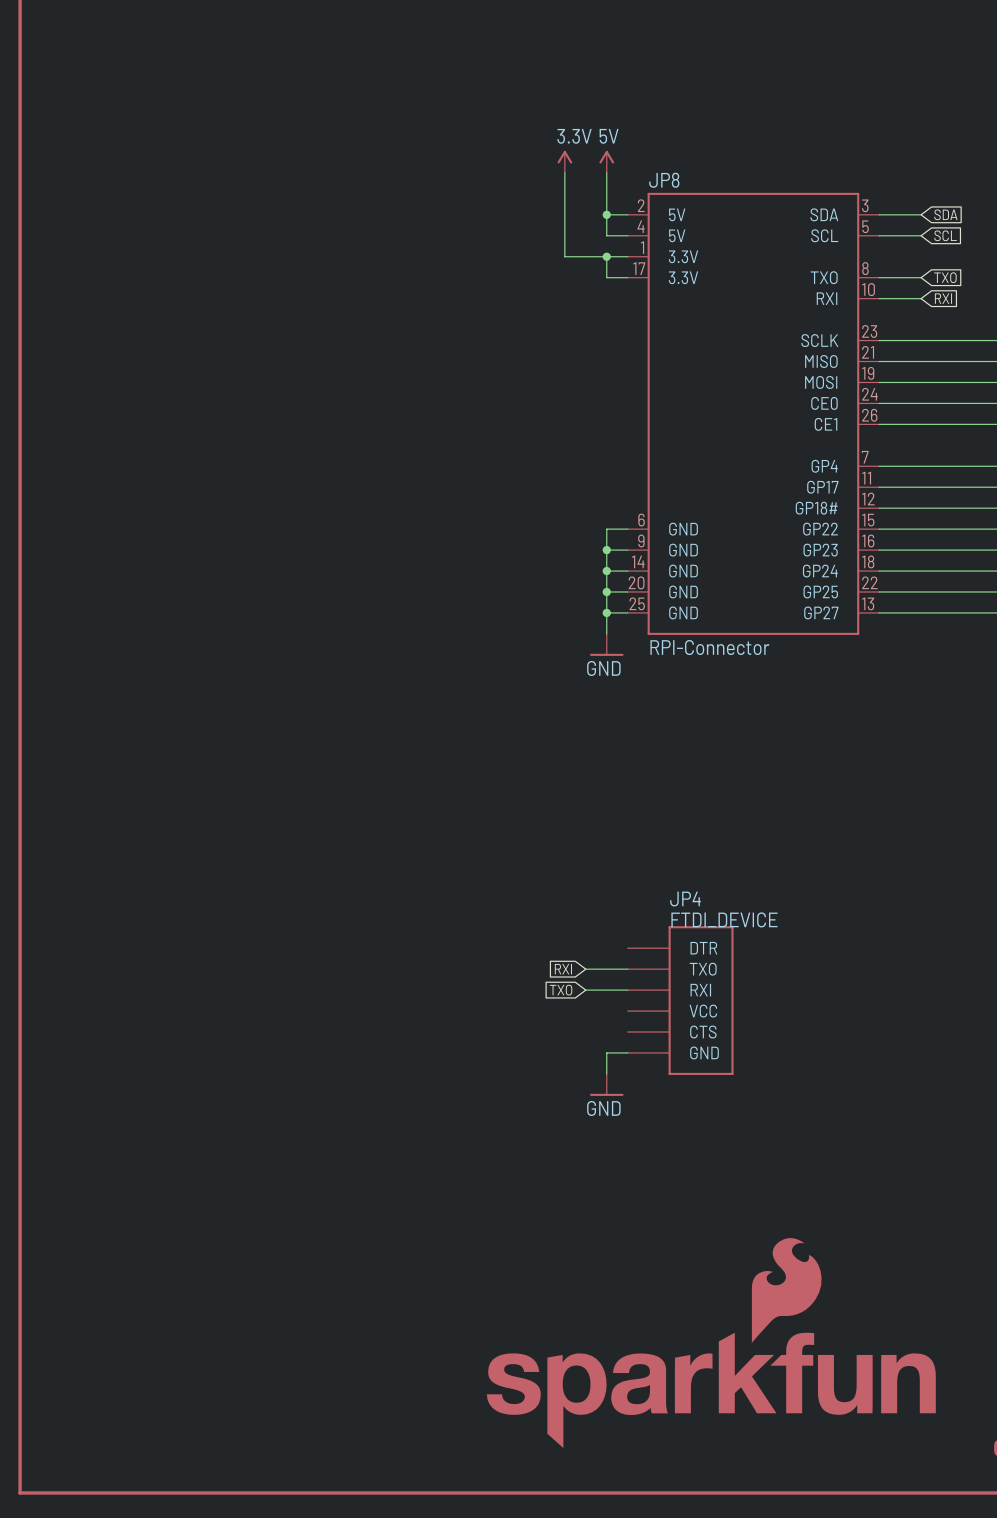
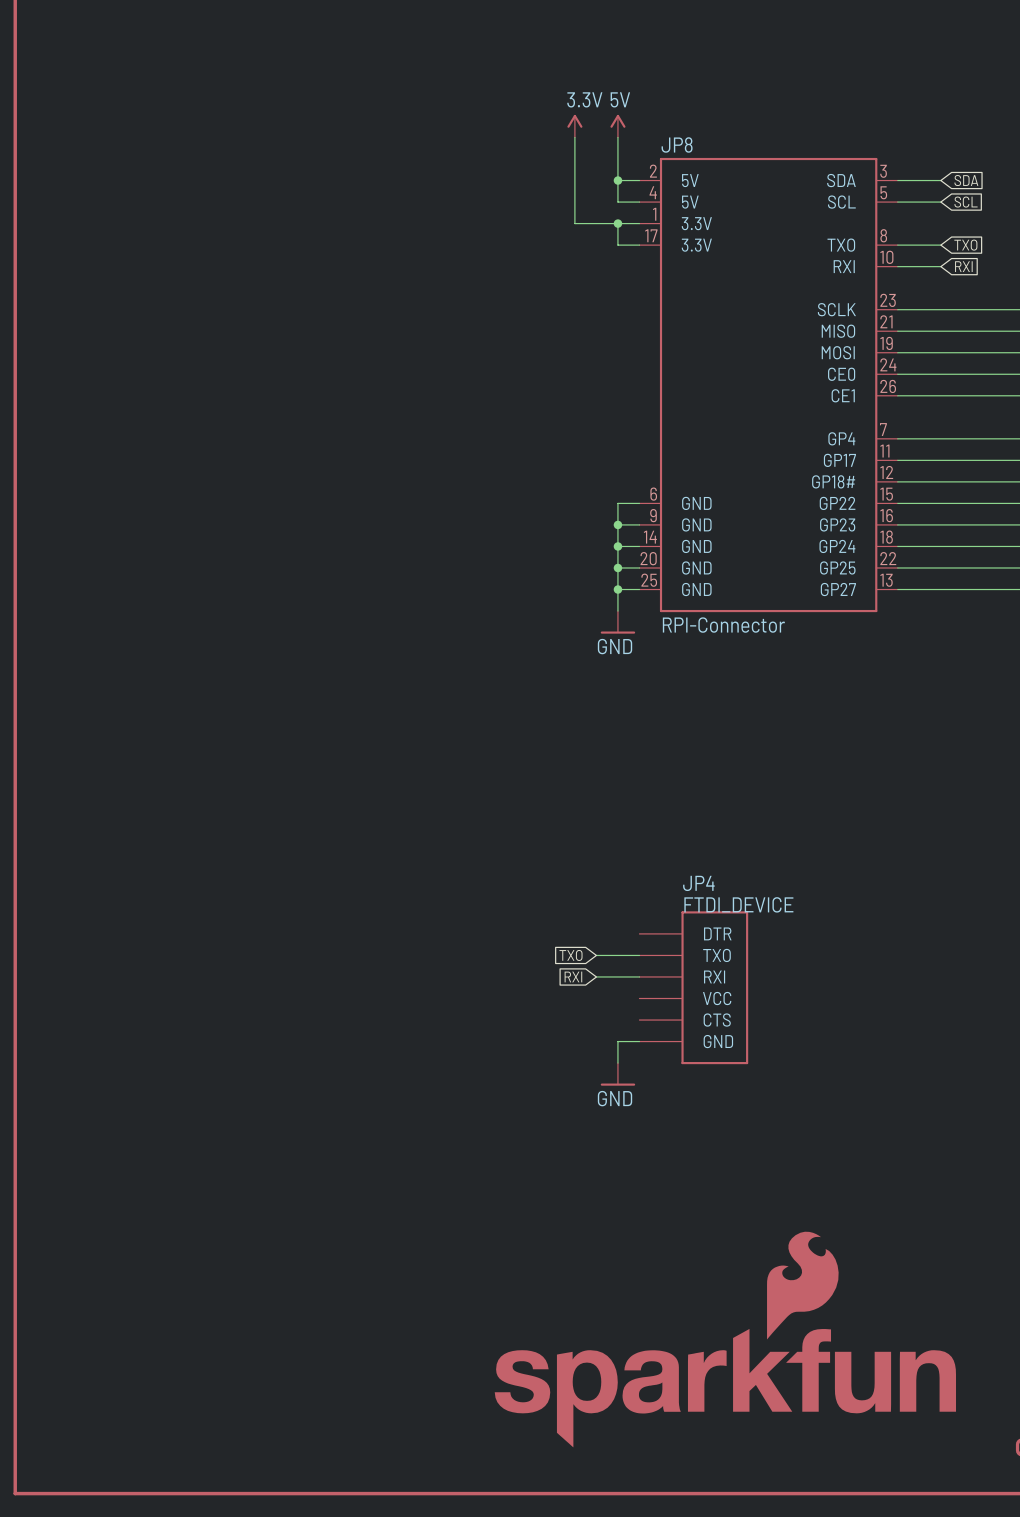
global label: RXI (563, 969) -> TXO (570, 955)
global label: TXO (561, 990) -> RXI (573, 976)

